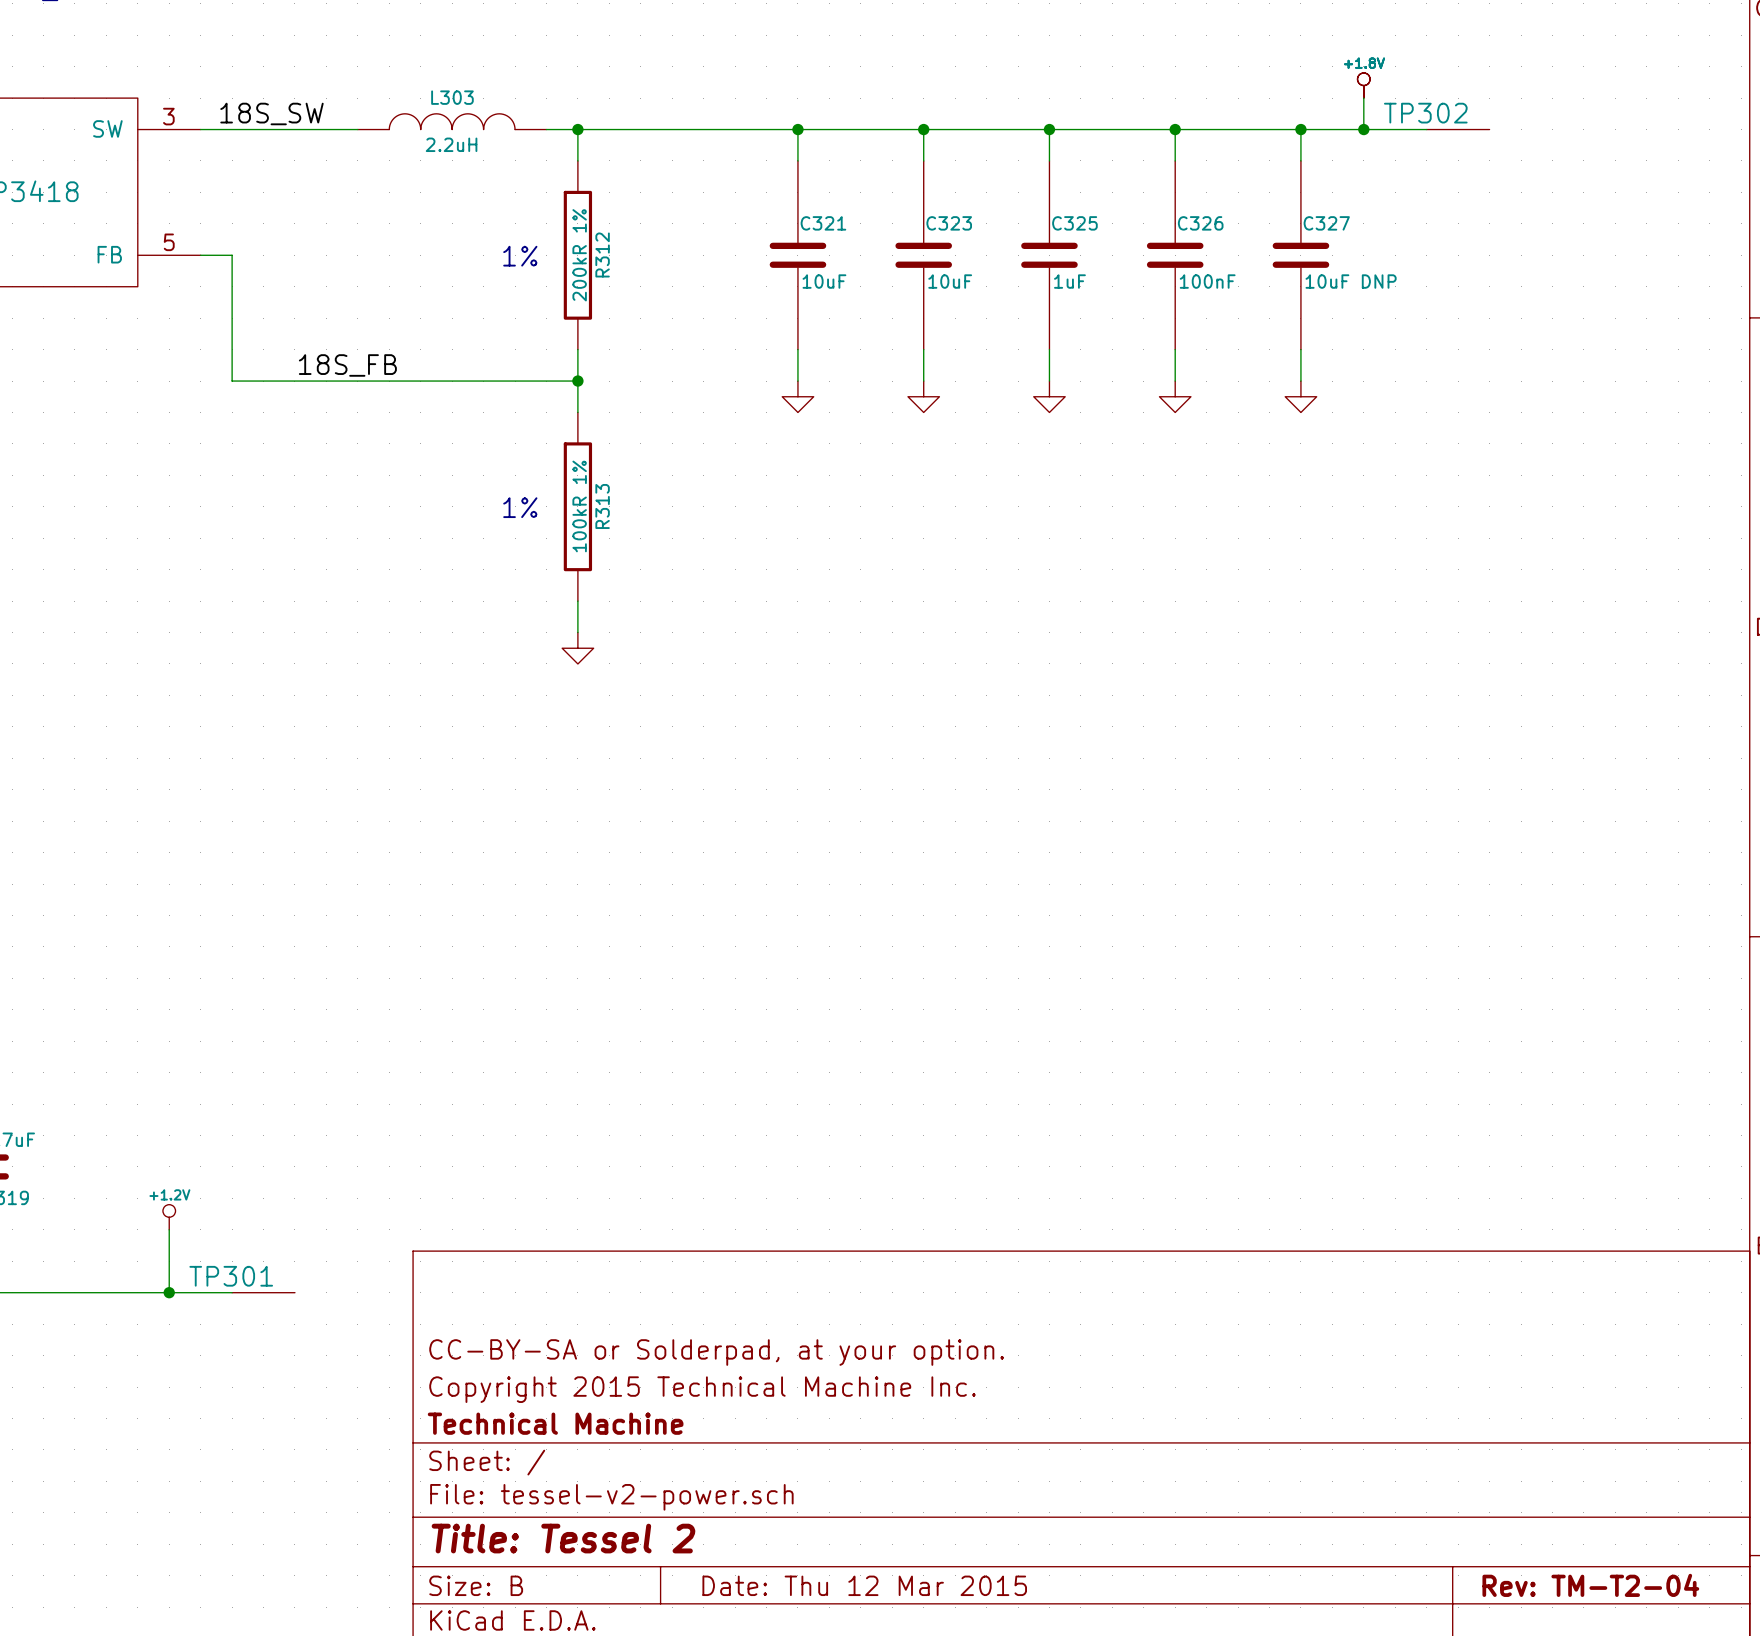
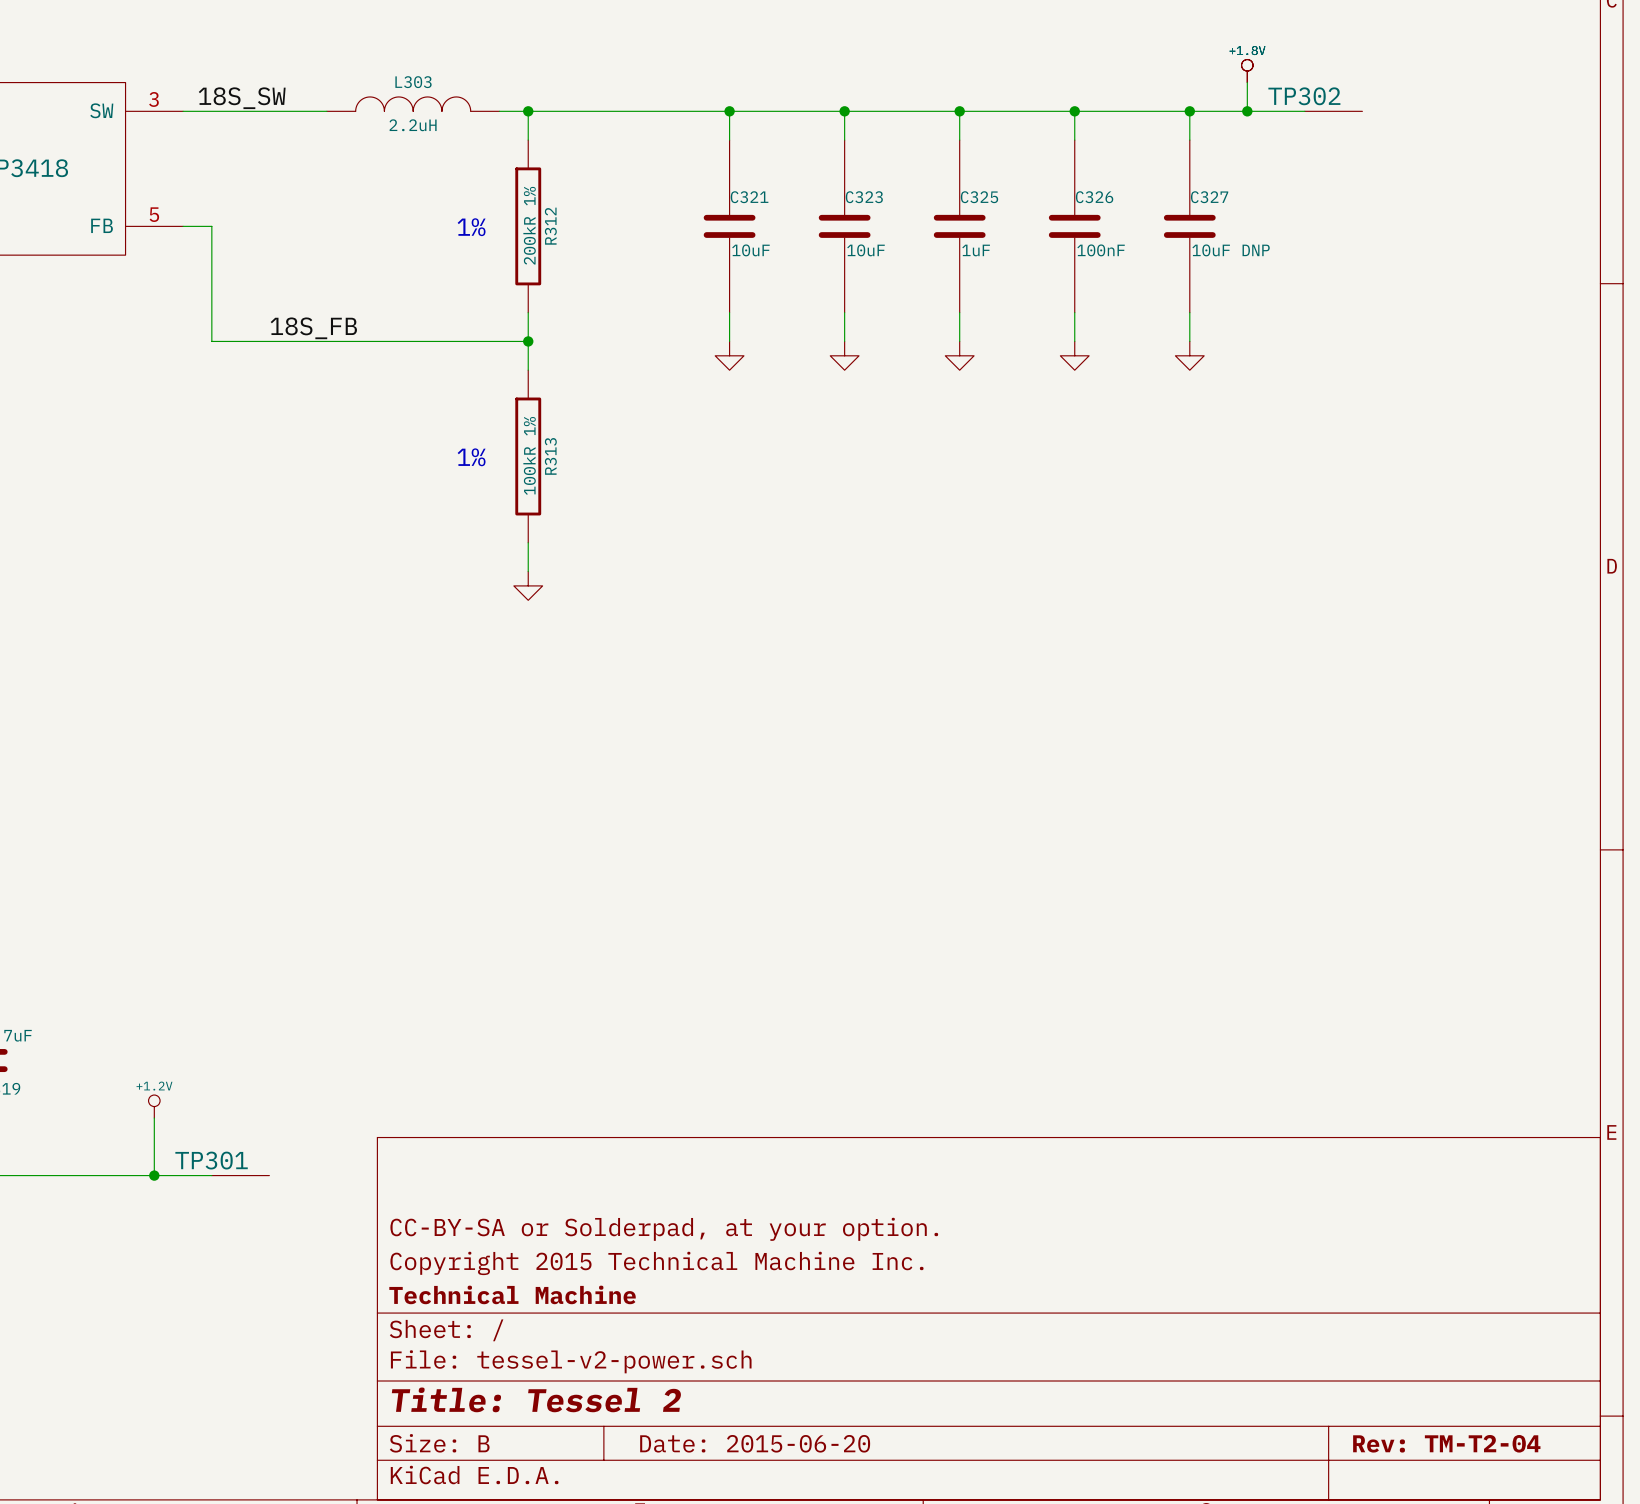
title block: Date: Thu 12 Mar 2015 (864, 1585) -> Date: 2015-06-20 (755, 1443)

